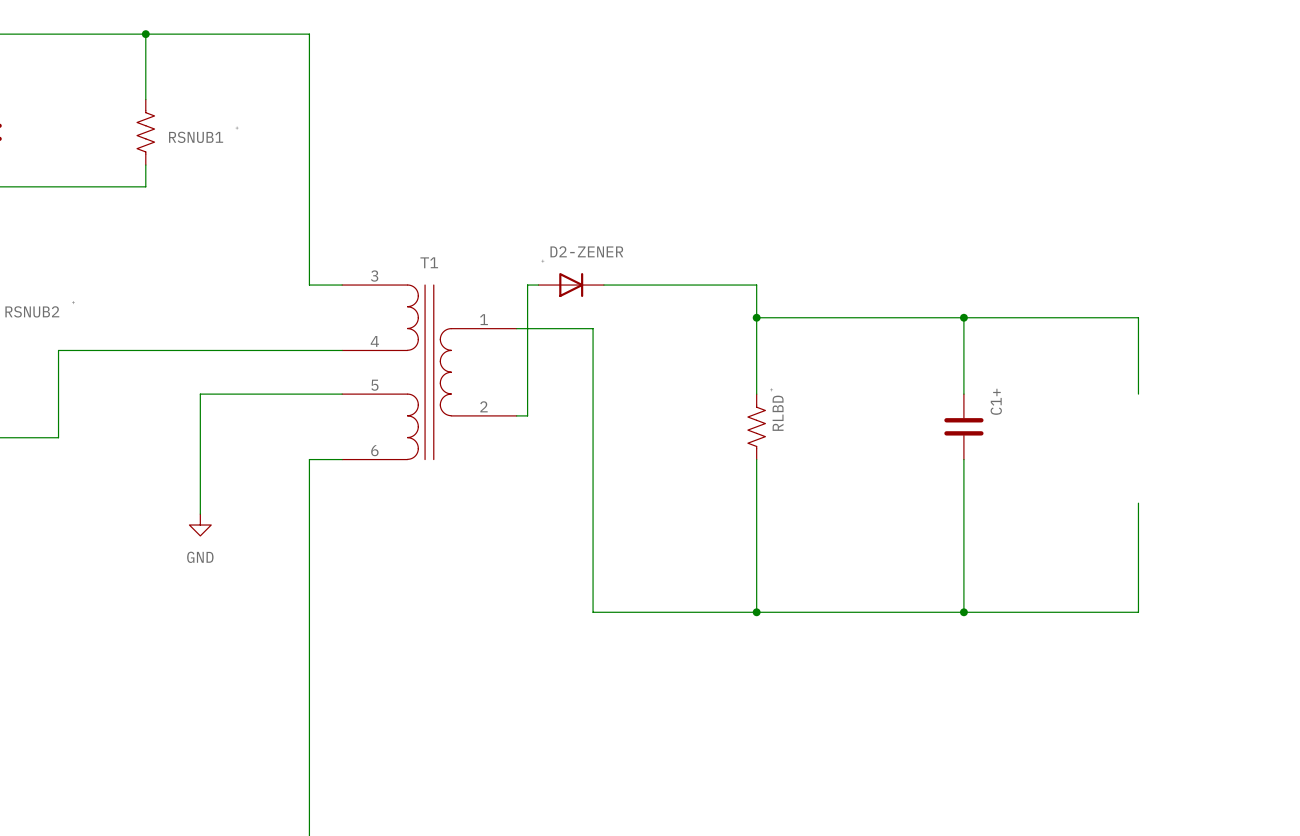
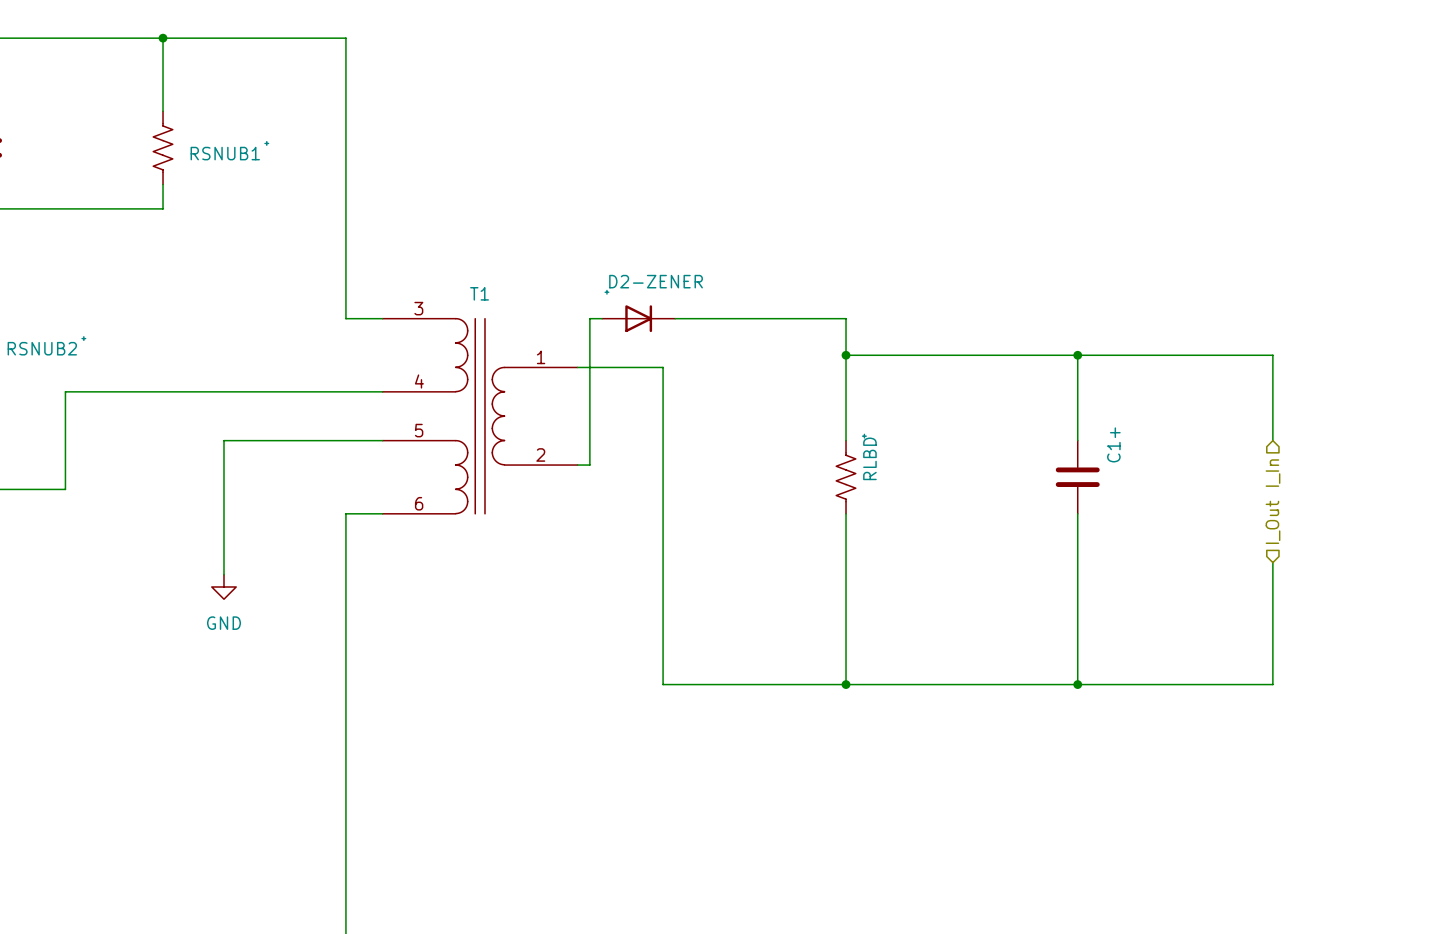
hierarchical label: none -> I_In (1273, 473)
hierarchical label: none -> I_Out (1273, 522)

